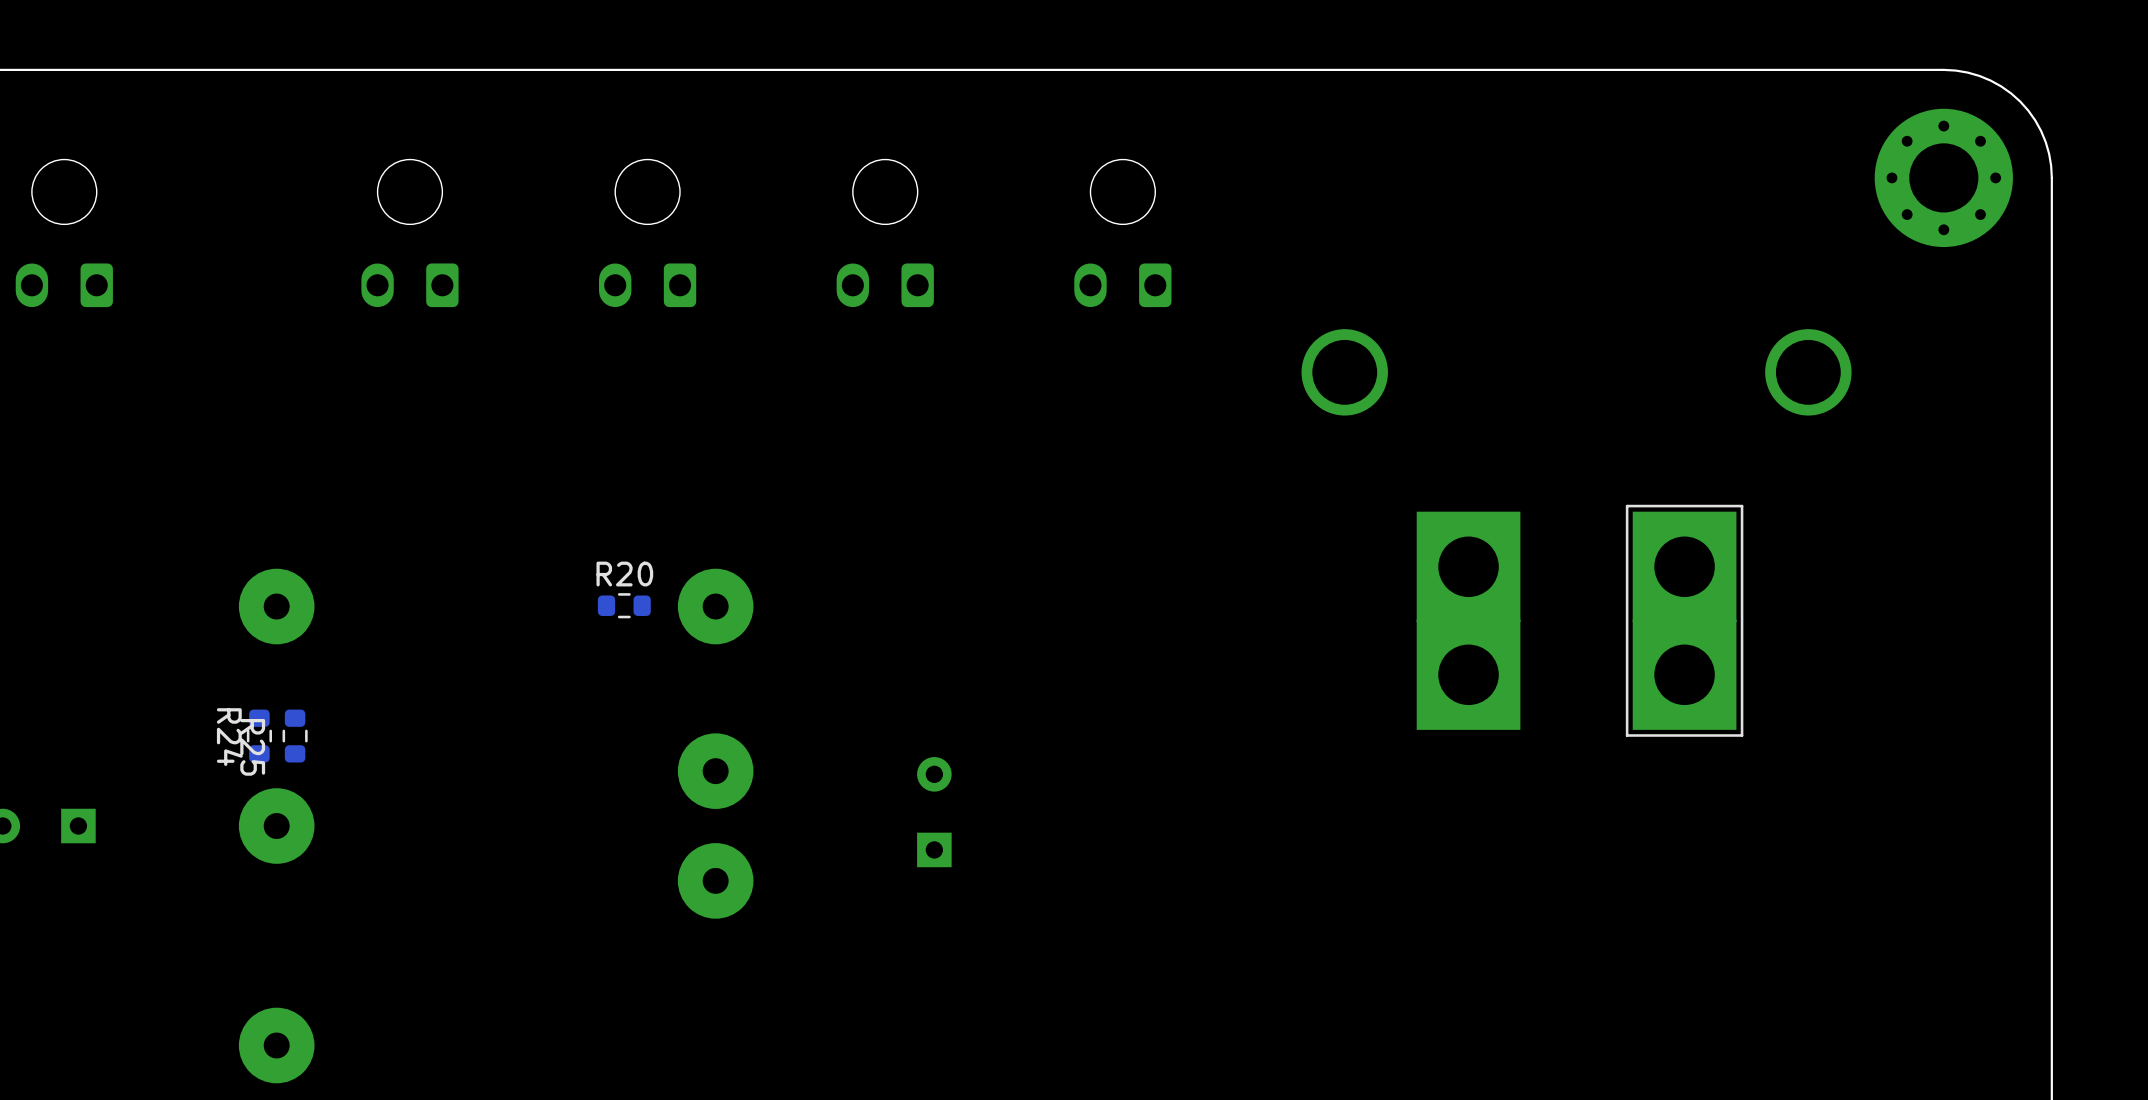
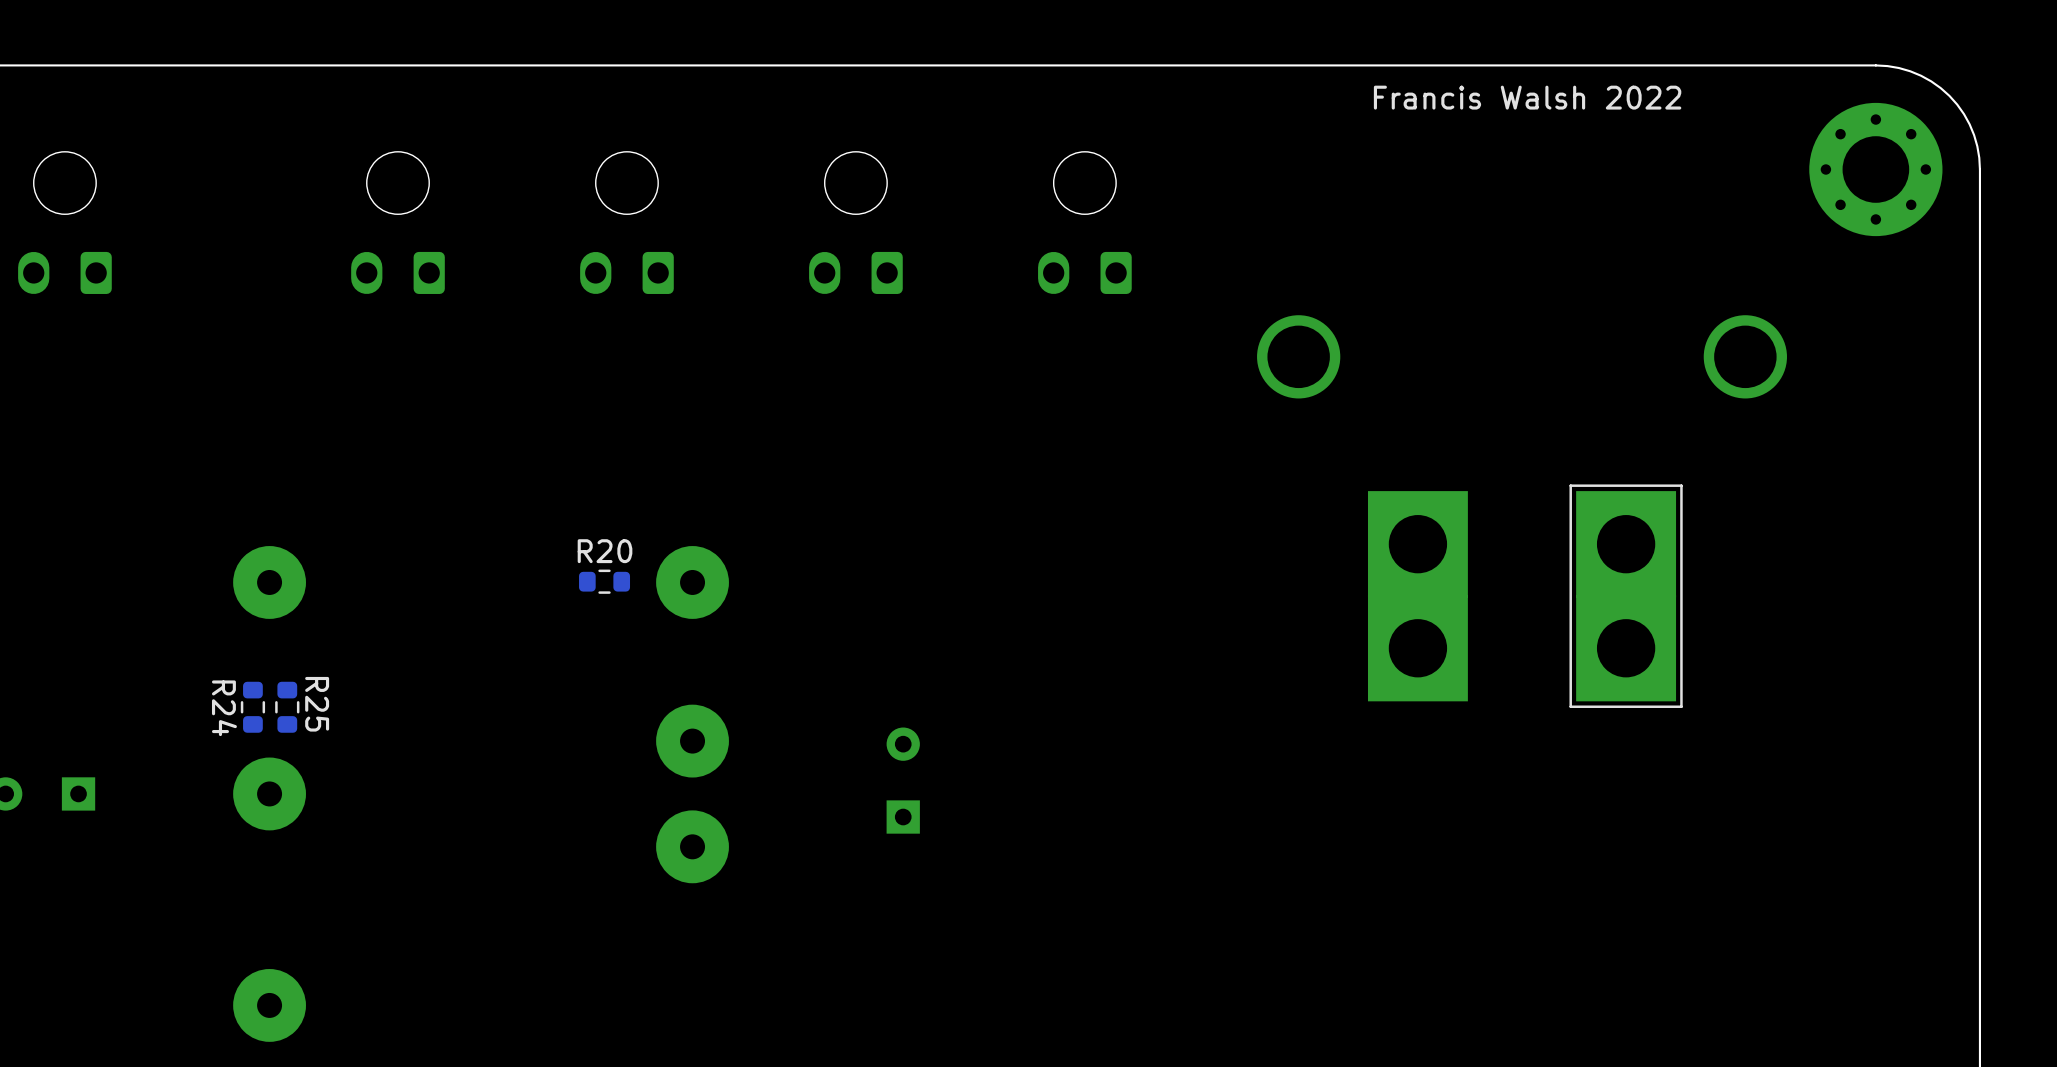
text: none -> Francis Walsh 2022 (1527, 97)
R25 name position: R25 (252, 747) -> R25 (317, 704)

